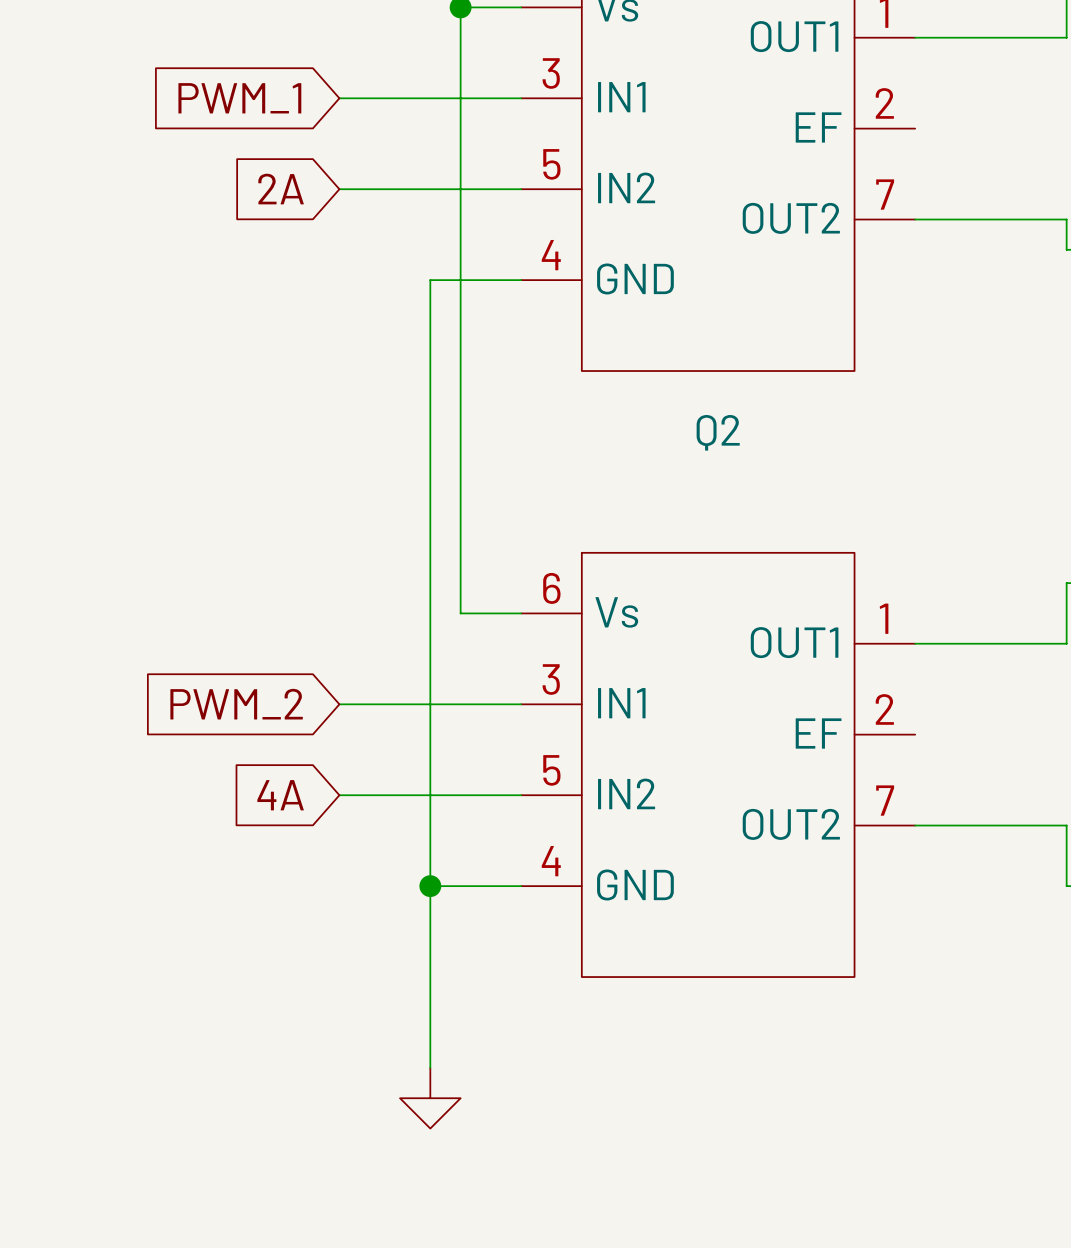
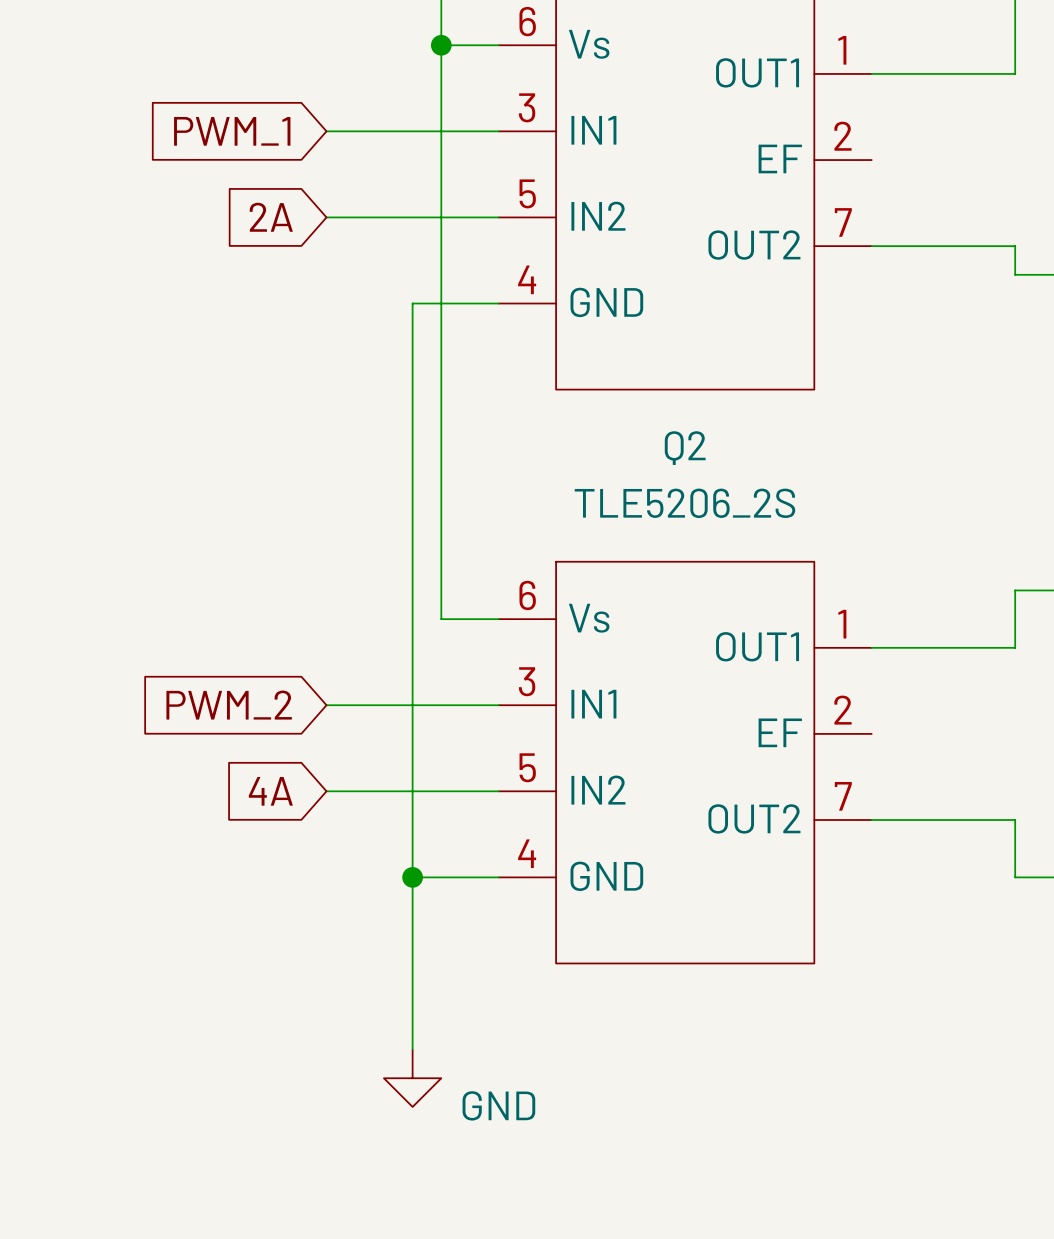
Q2 value: none -> TLE5206_2S (684, 503)
power symbol text: none -> GND (498, 1105)

